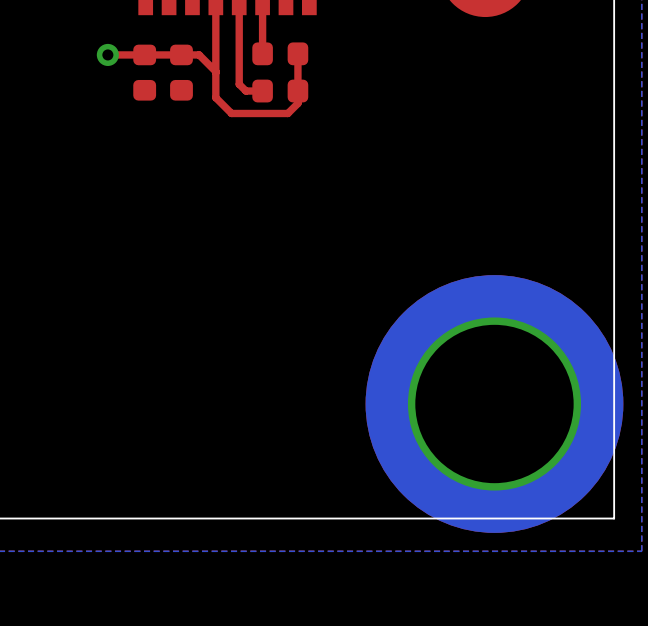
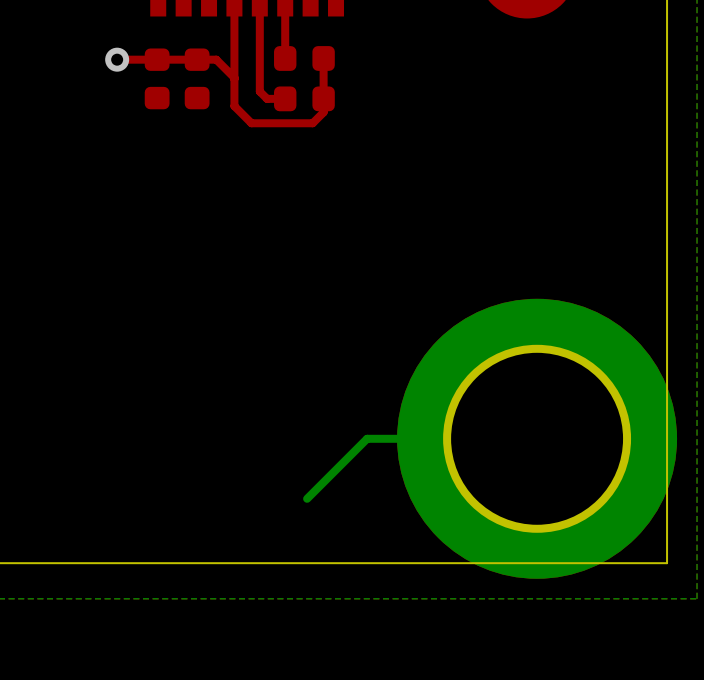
bottom track: none -> (537, 438) (367, 438) (307, 498)

